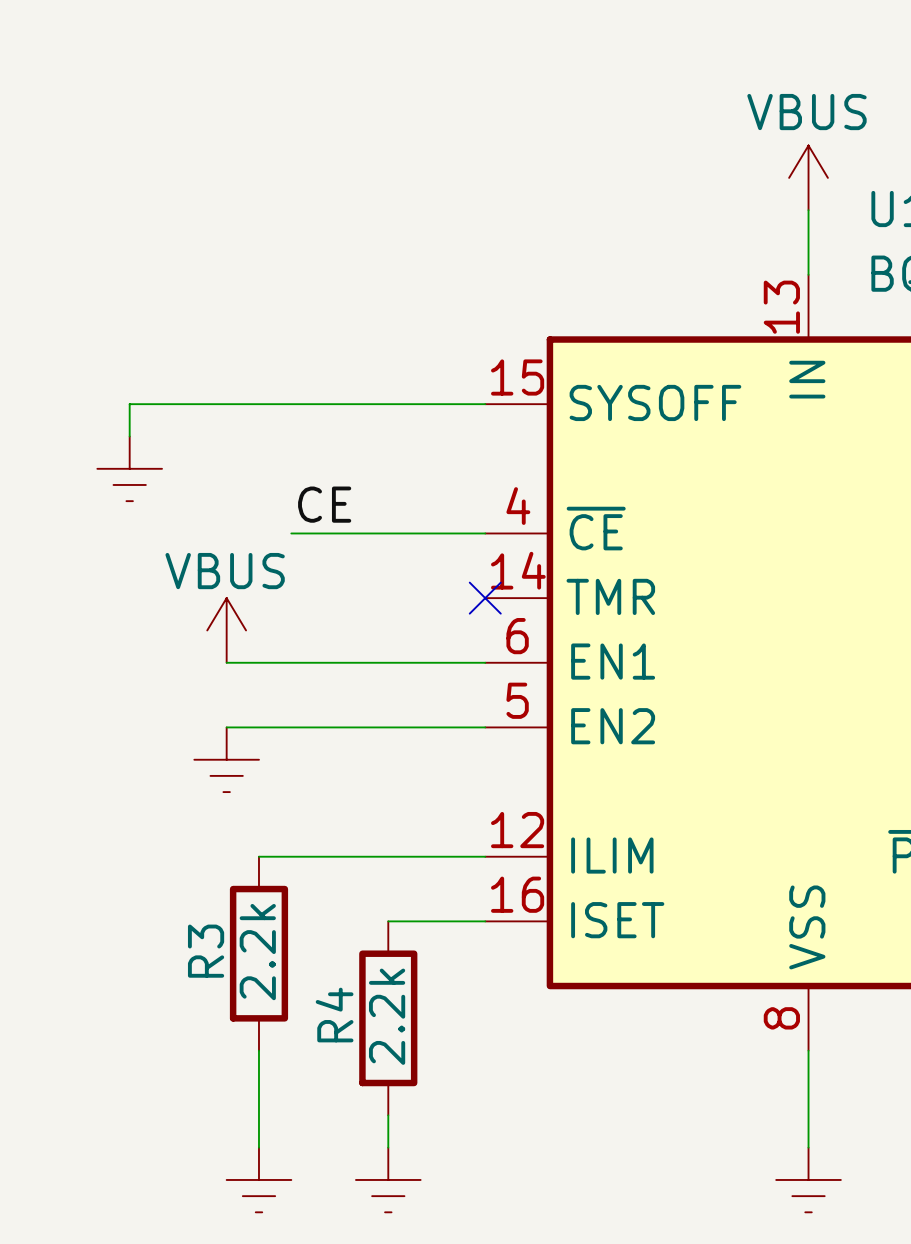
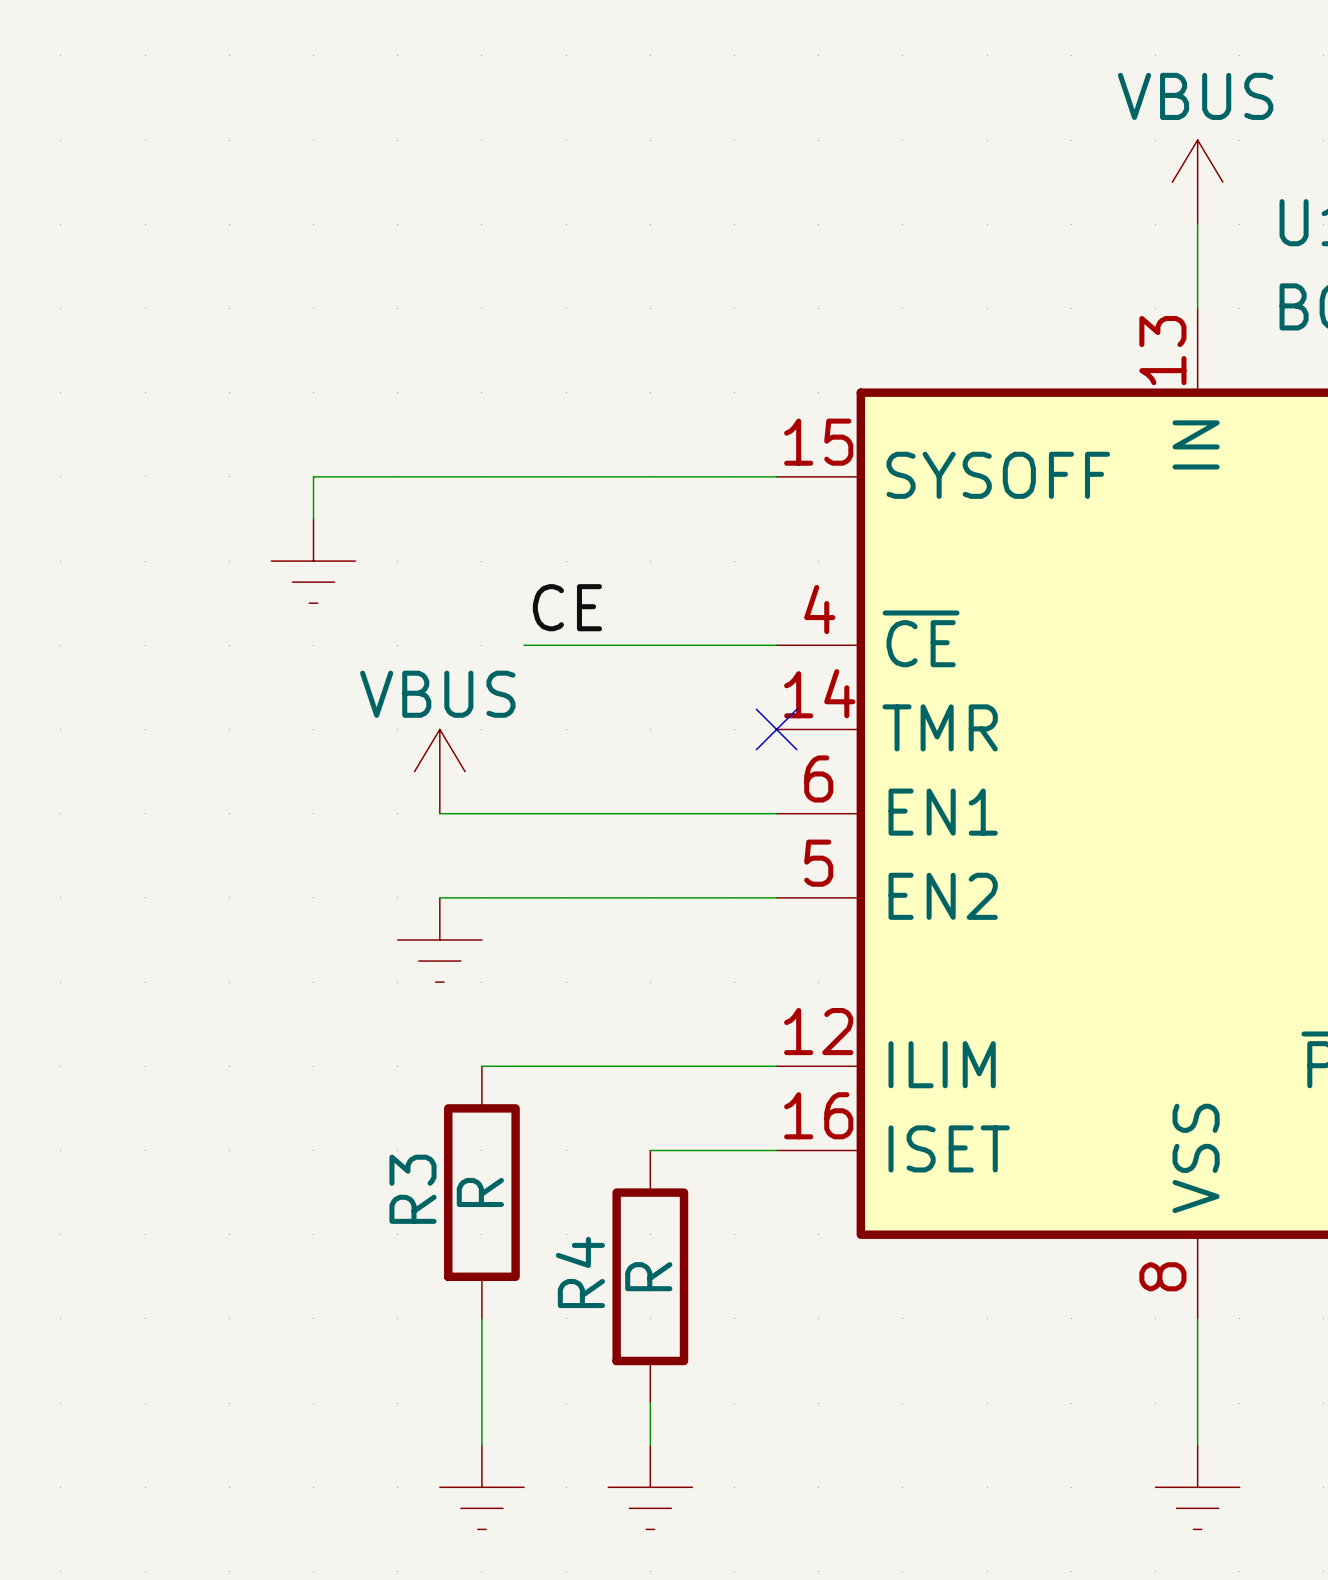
R3 value: 2.2k (257, 952) -> R (480, 1192)
R4 value: 2.2k (387, 1016) -> R (648, 1276)

